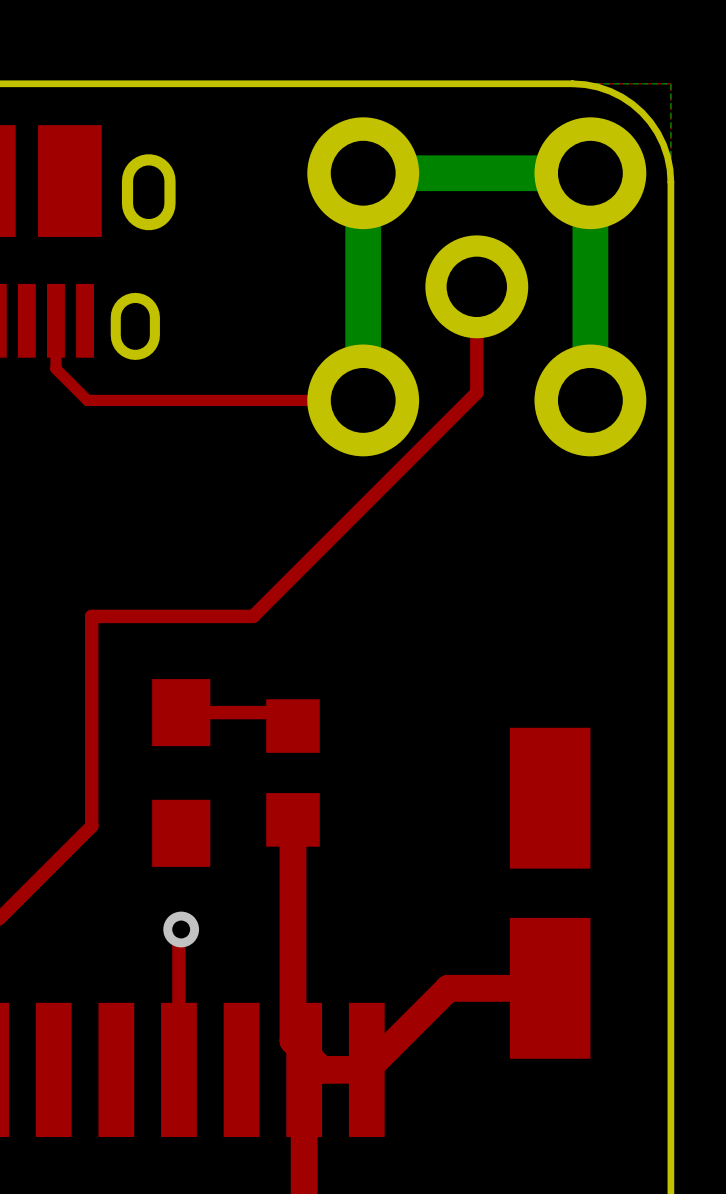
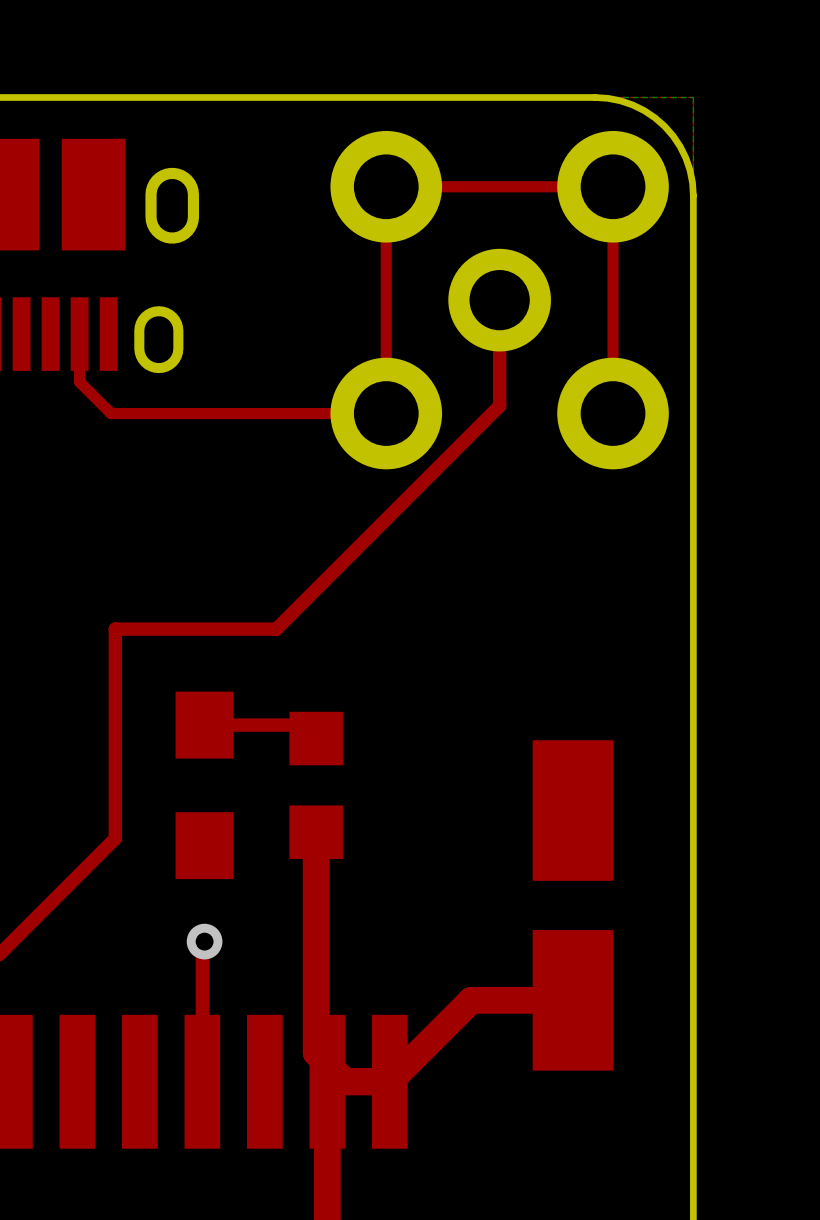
bottom track: (590, 400) (590, 173) (363, 173) (363, 400) -> none
top track: none -> (613, 413) (613, 186) (386, 186) (386, 413)

